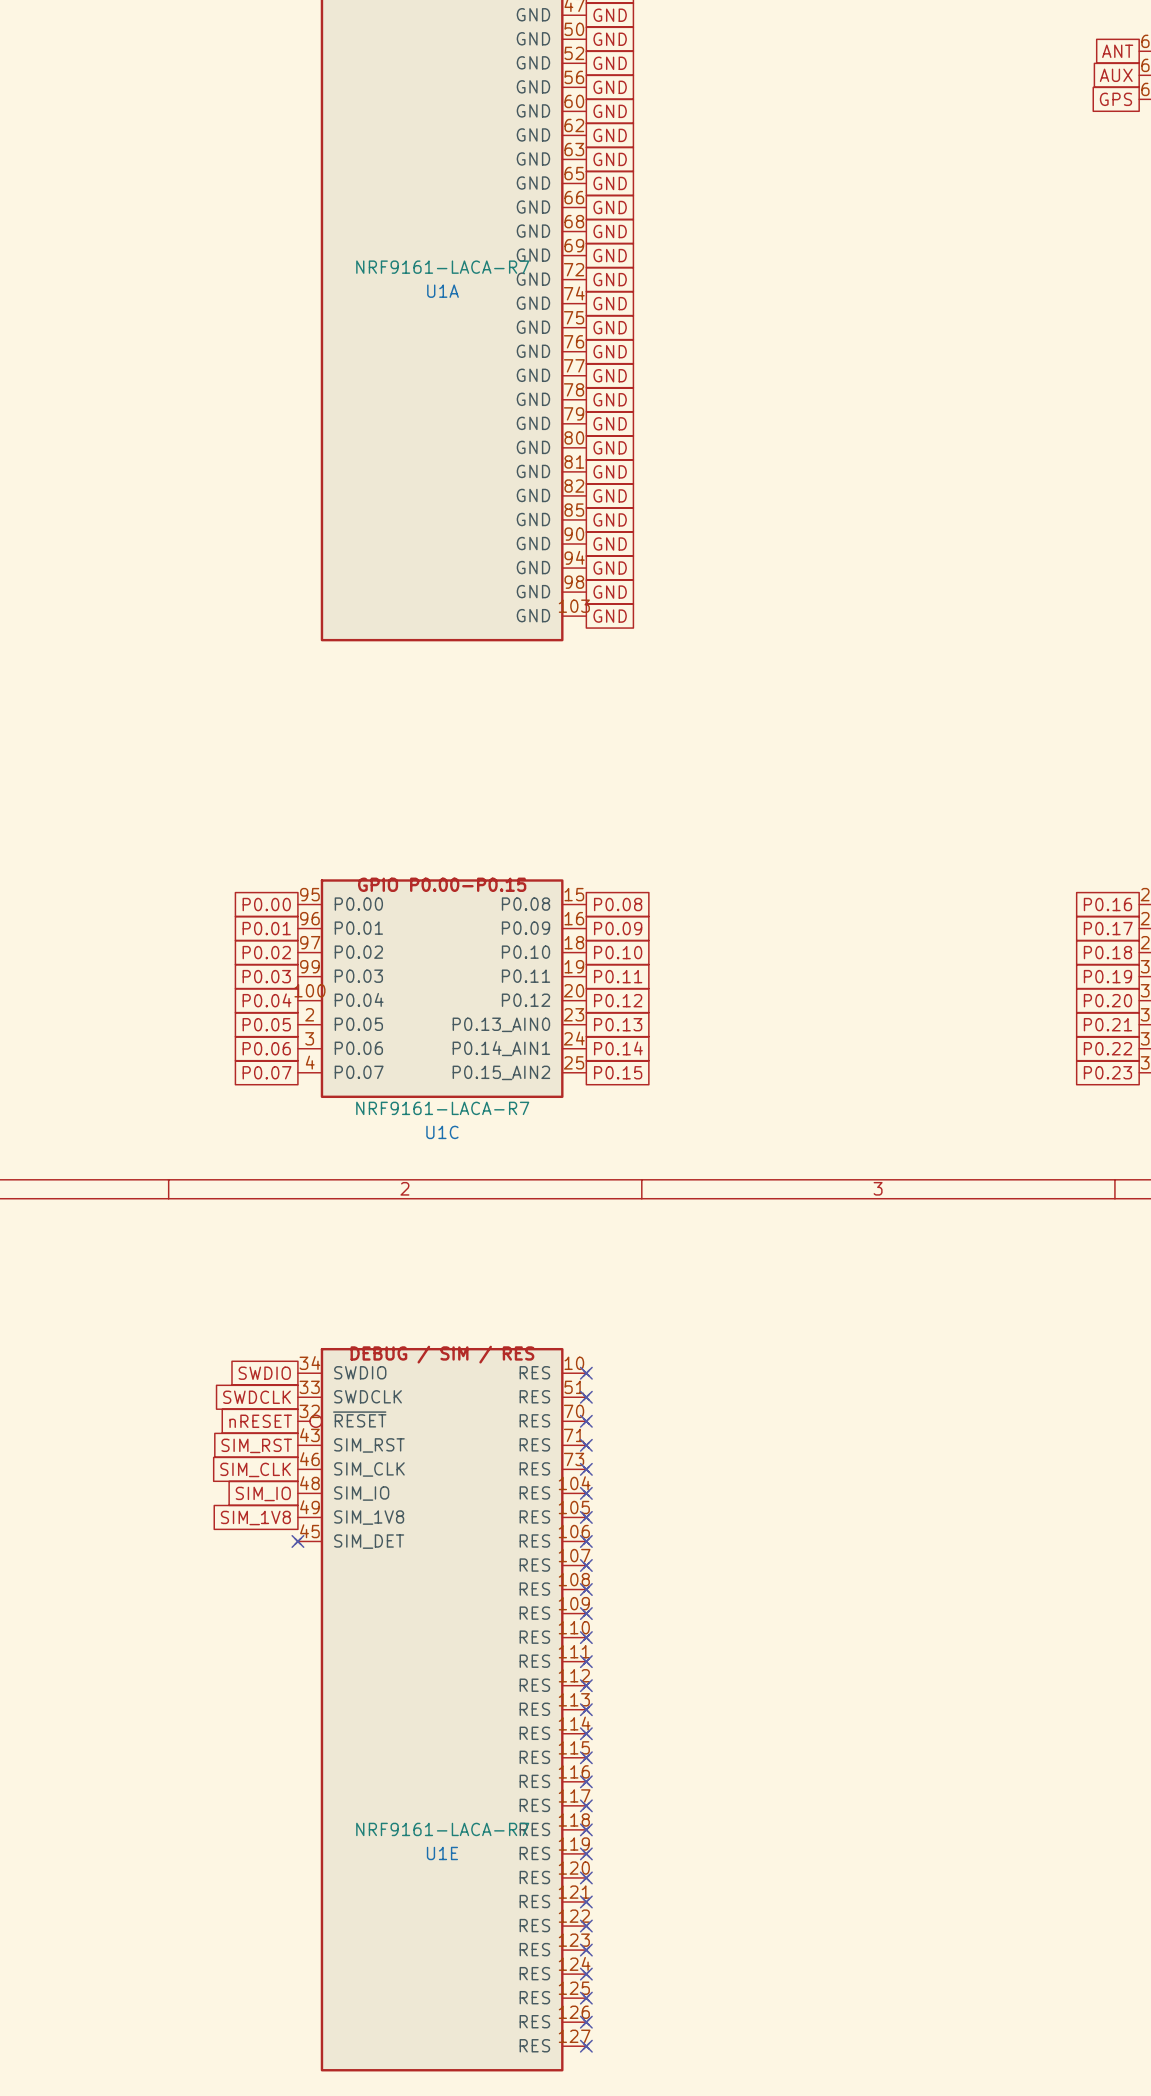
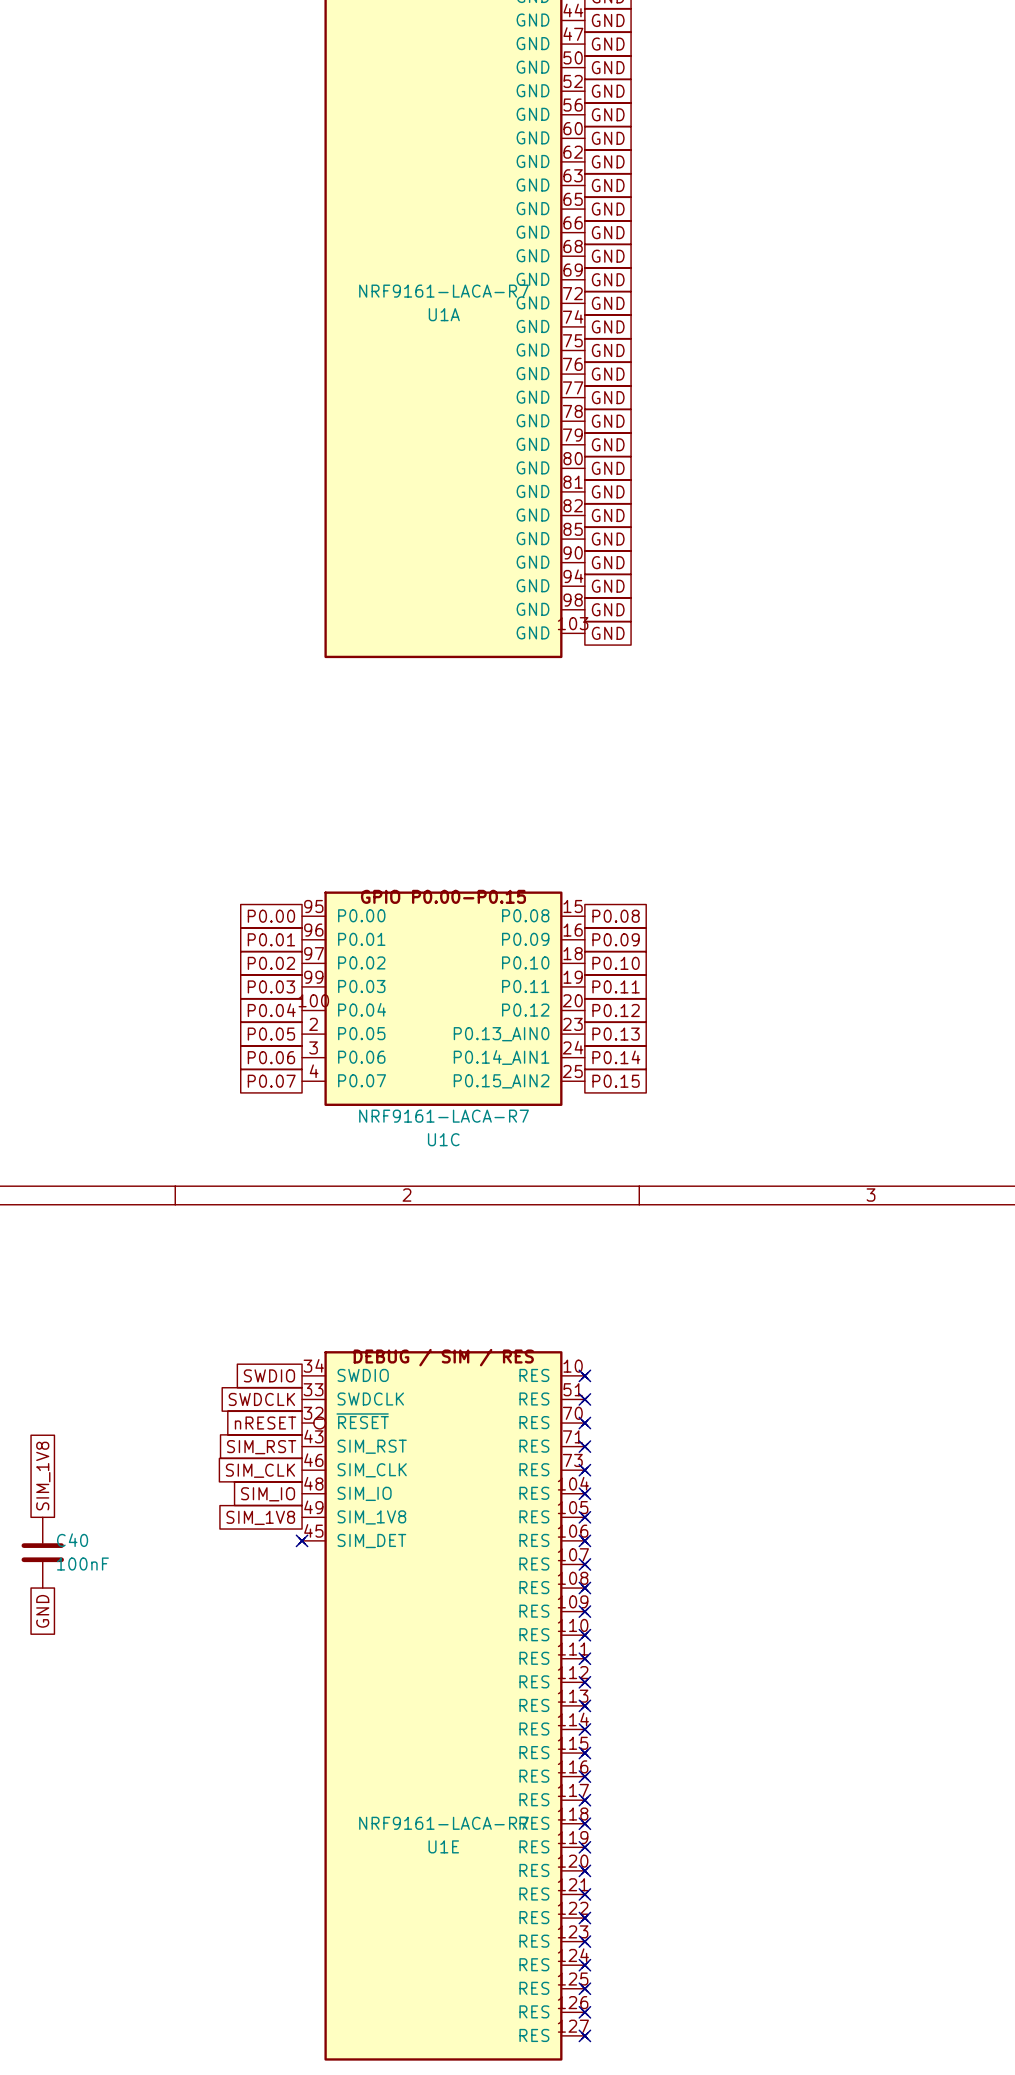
global label: none -> SIM_1V8 (43, 1476)
C40: none -> 100nF (42, 1552)
global label: none -> GND (42, 1611)

